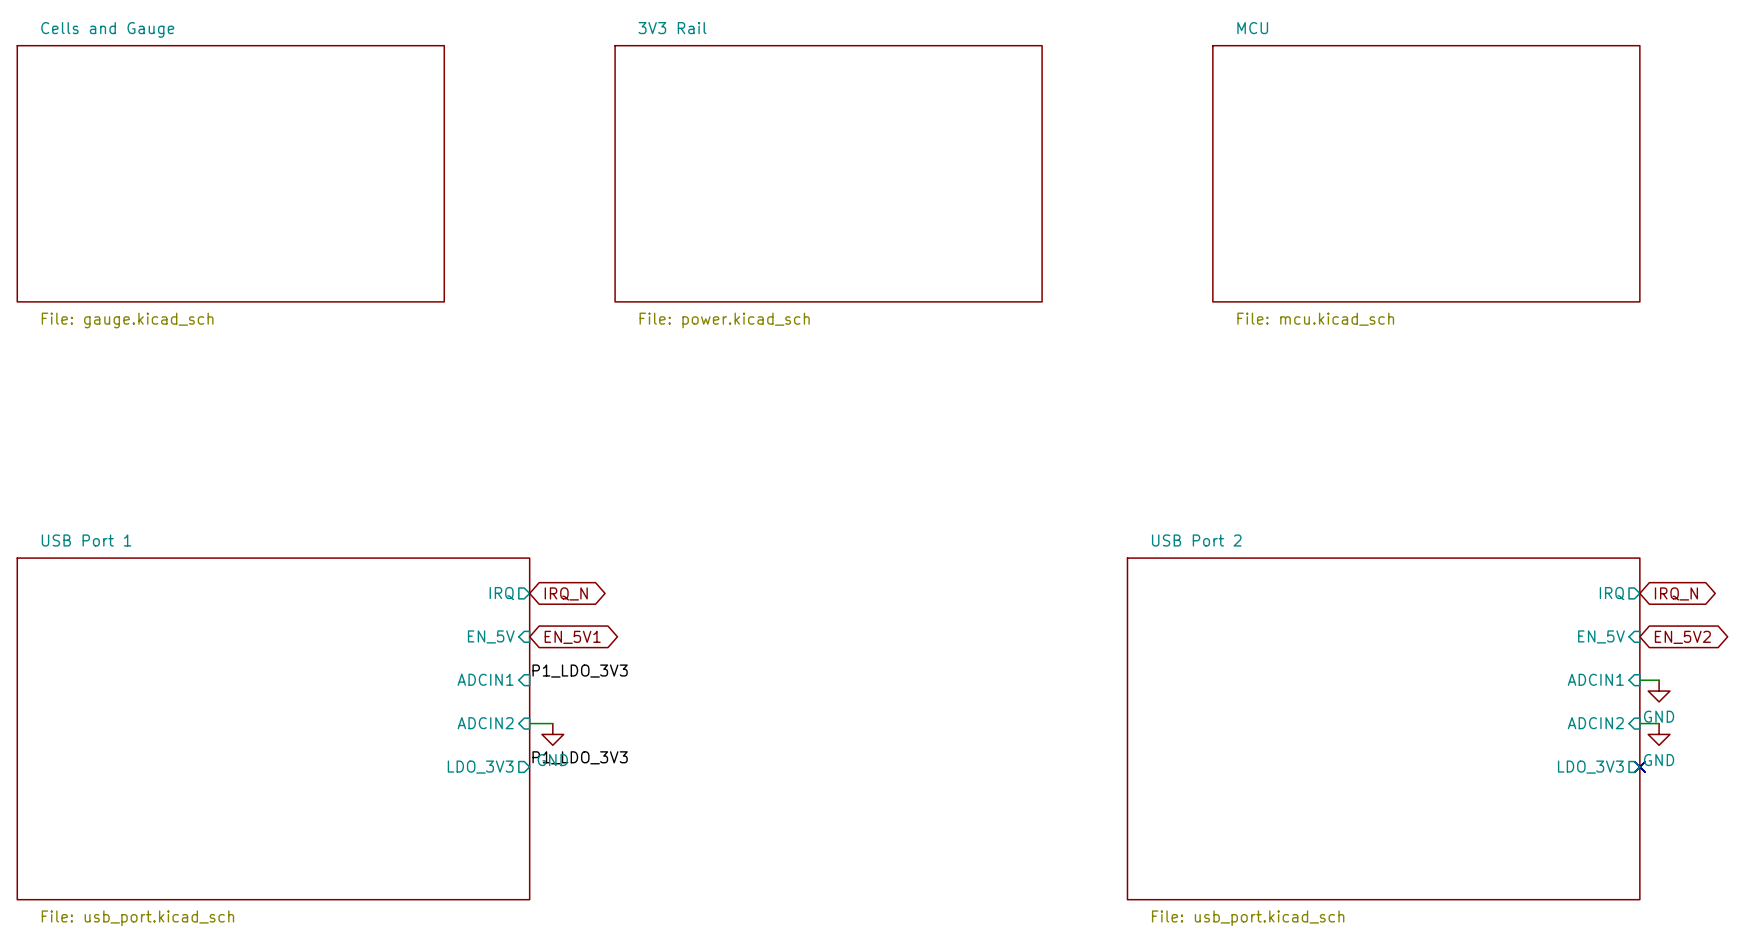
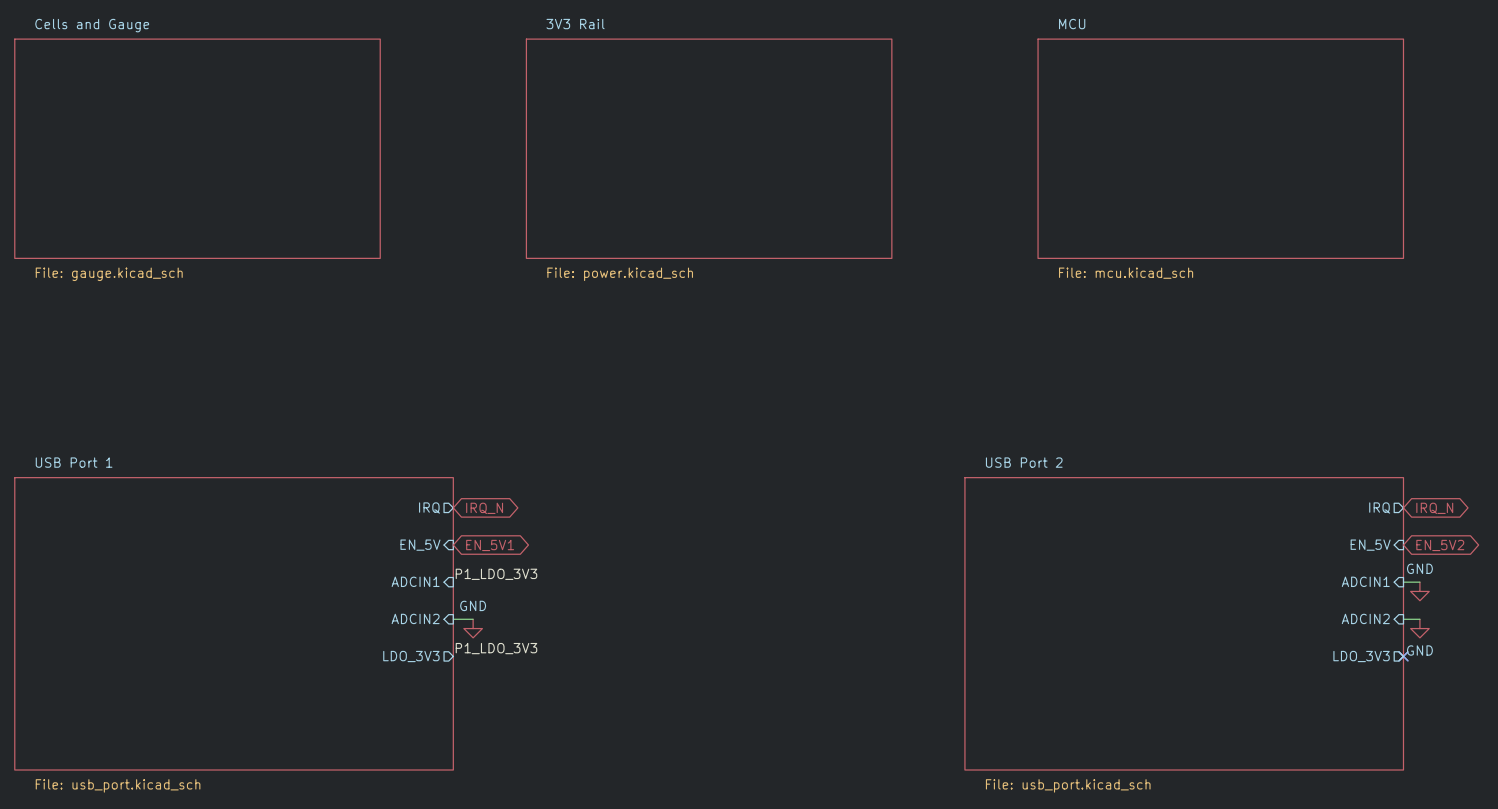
power symbol text position: GND (1659, 716) -> GND (1419, 568)
power symbol text position: GND (552, 760) -> GND (473, 605)

